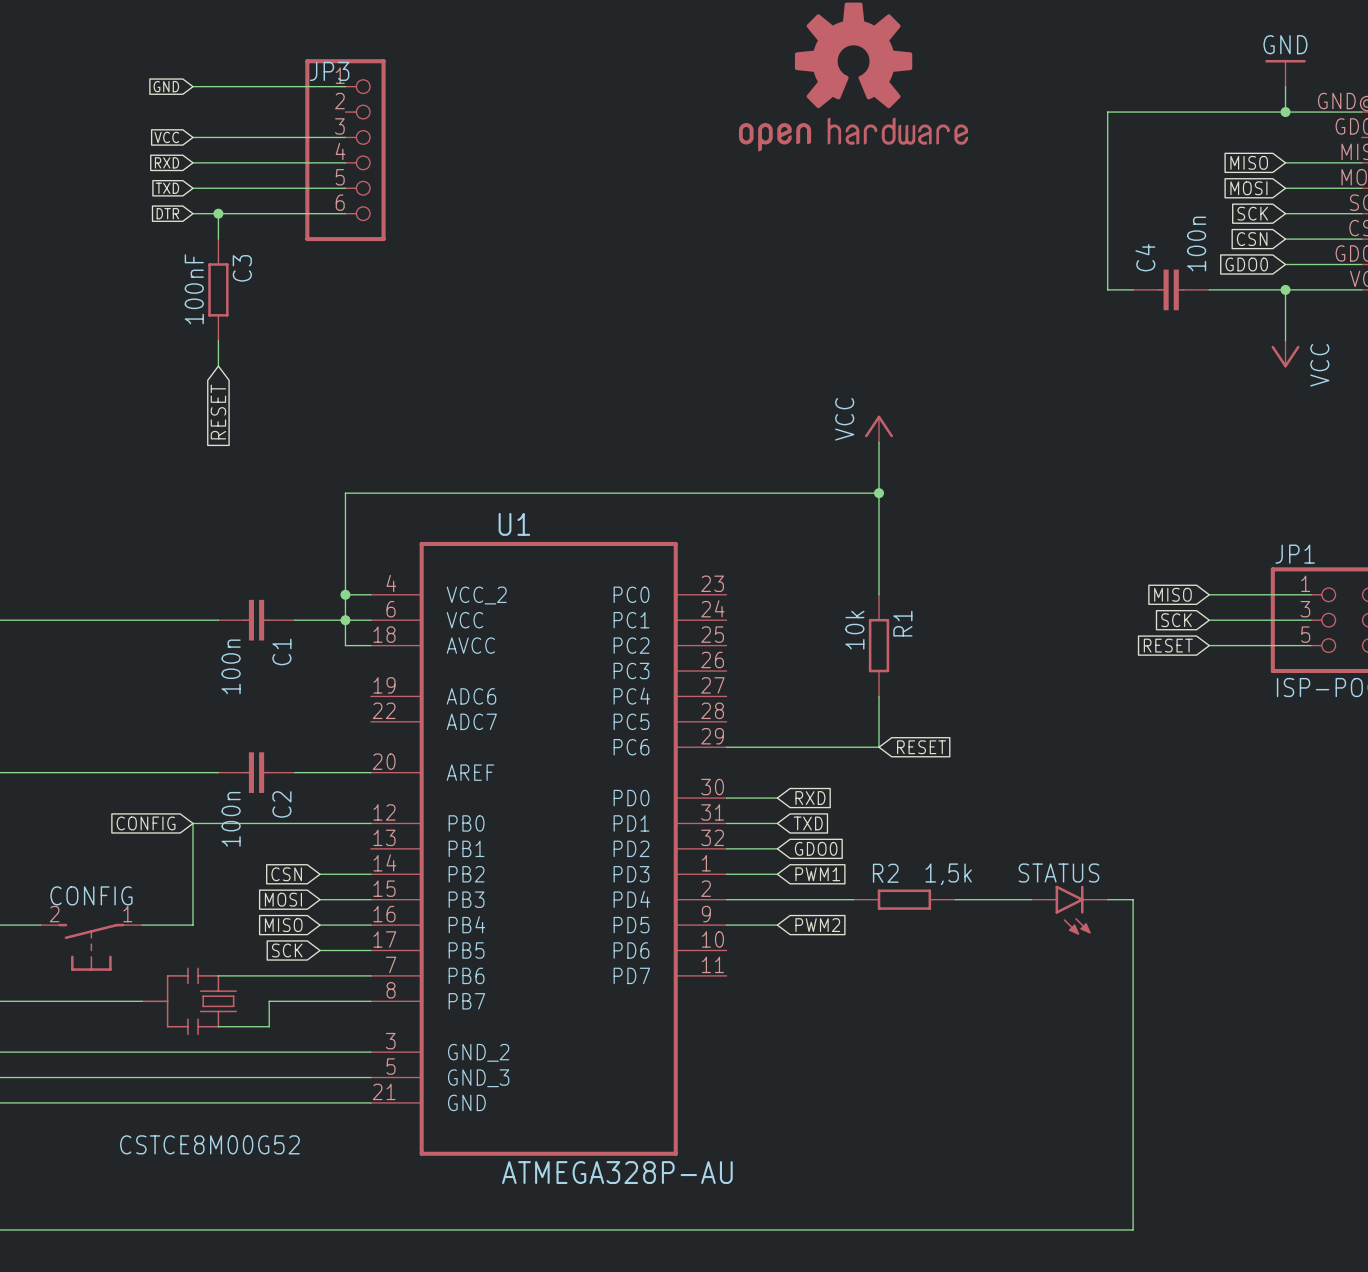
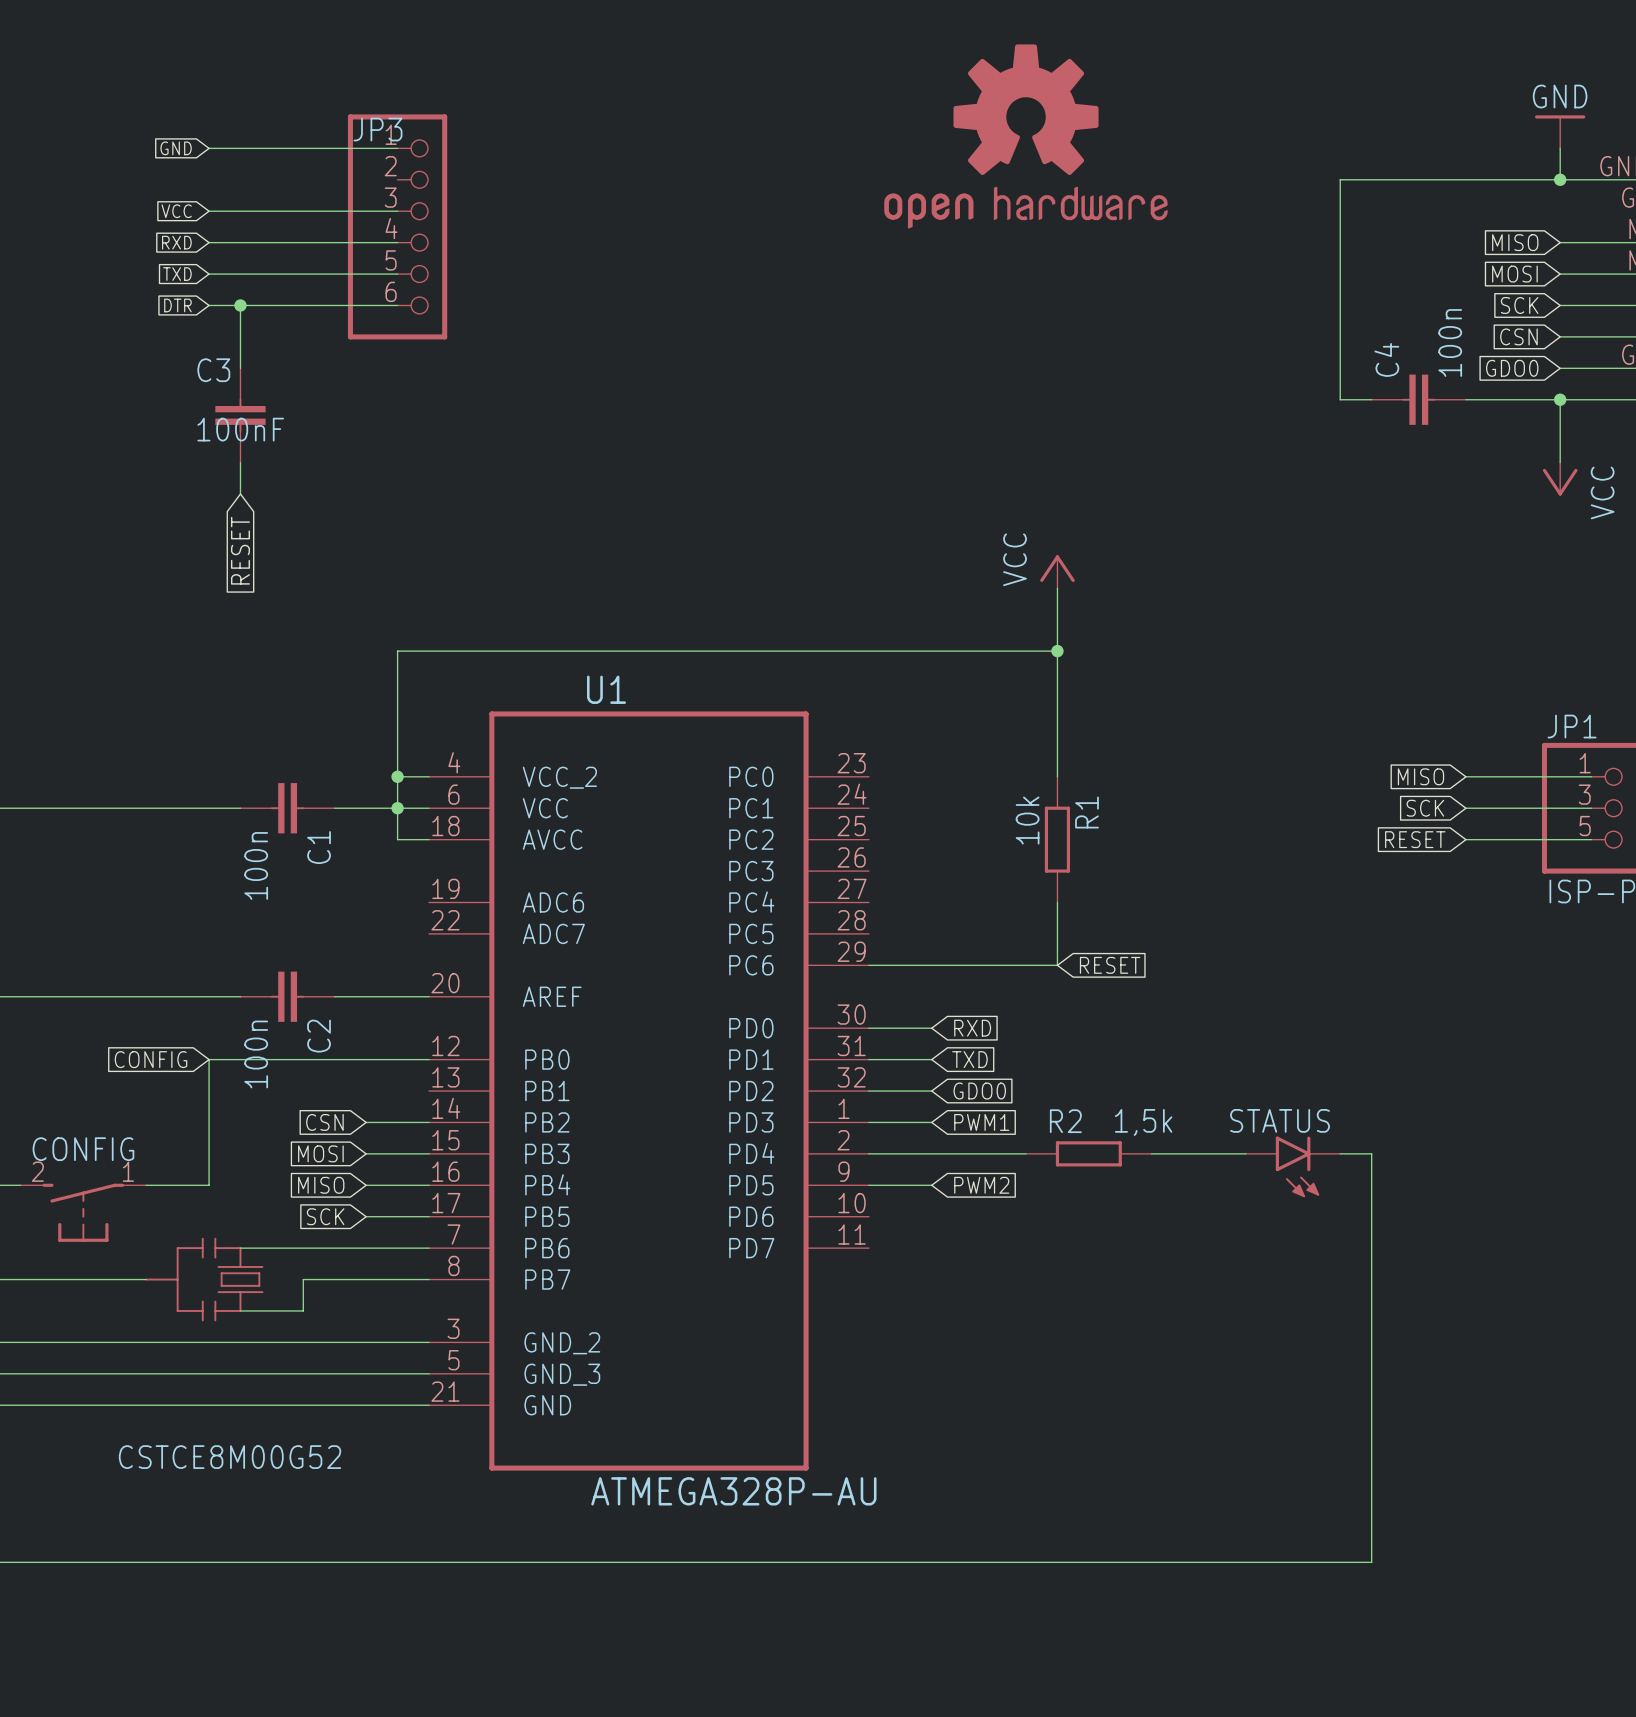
C3 symbol: [208, 239, 229, 341] -> [215, 368, 266, 463]
C3 name position: C3 (242, 268) -> C3 (213, 370)
C3 value position: 100nF (194, 289) -> 100nF (240, 429)

